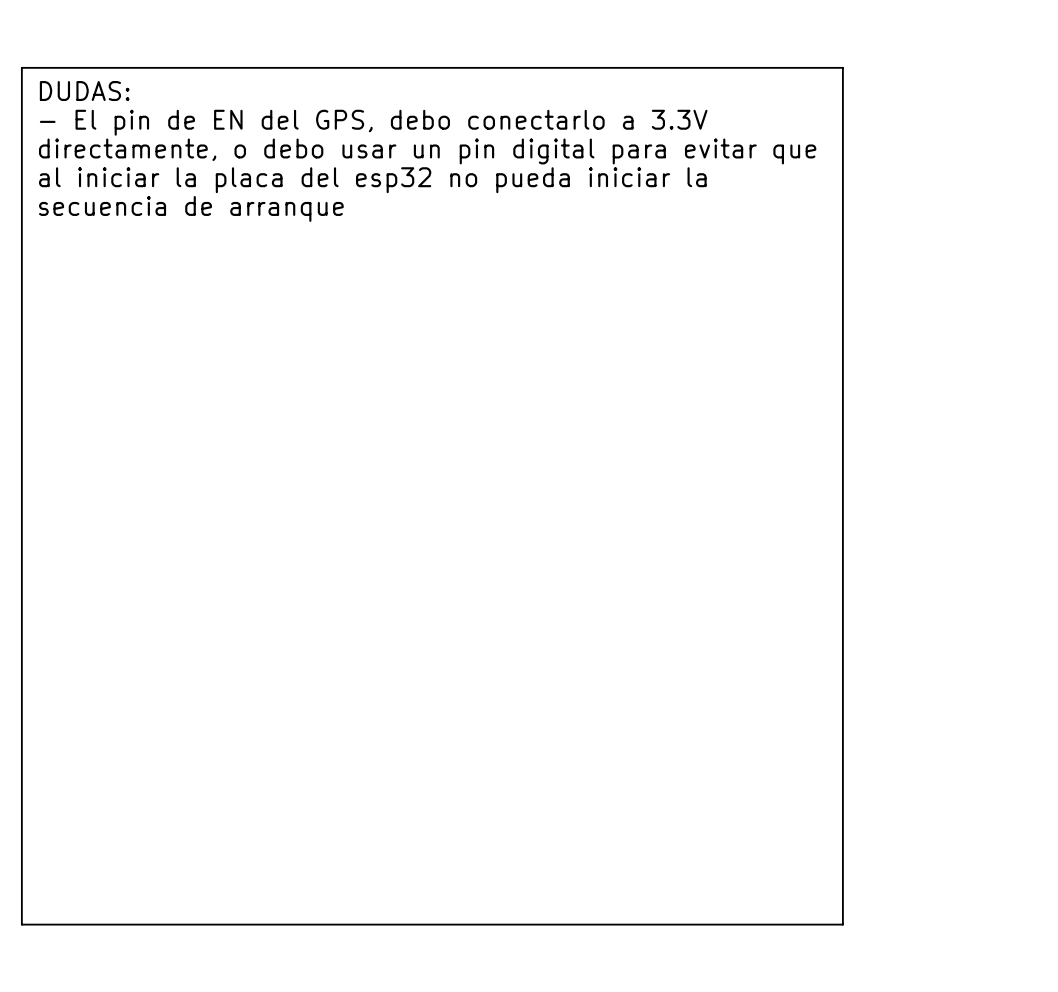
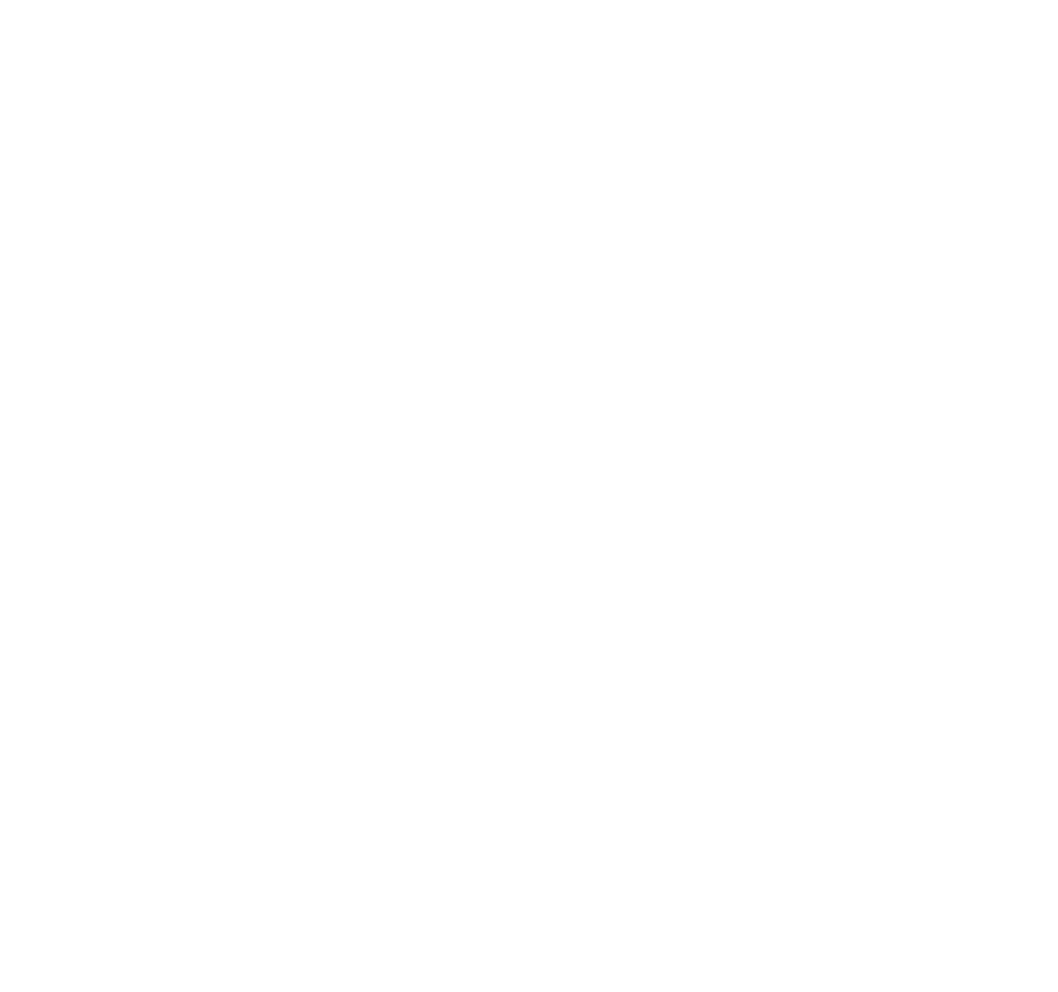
line: (21, 67) (842, 67) (842, 924) (21, 924) (21, 67) -> none
text: DUDAS: (84, 91) -> none
text: - El pin de EN del GPS, debo conectarlo a 3.3V (373, 122) -> none
text: directamente, o debo usar un pin digital para evitar que (427, 151) -> none
text: al iniciar la placa del esp32 no pueda iniciar la (372, 180) -> none
text: secuencia de arranque (191, 208) -> none

